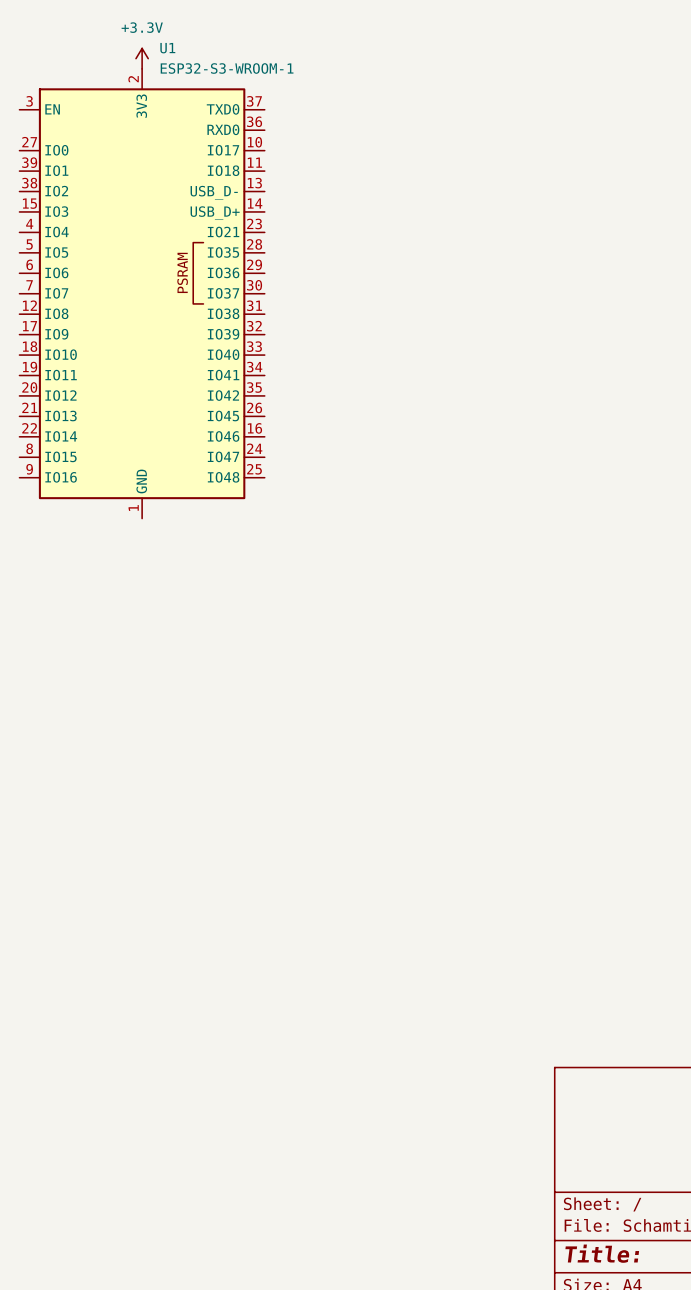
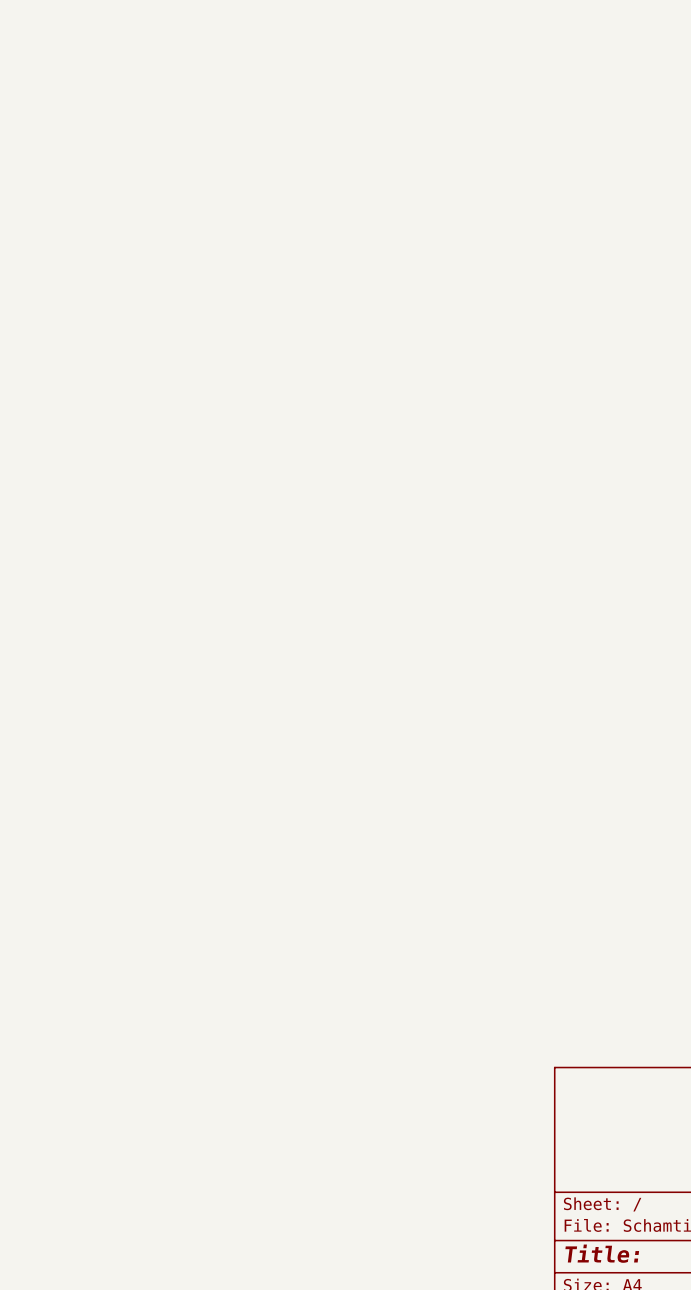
power symbol: +3.3V (142, 58) -> none
U1: ESP32-S3-WROOM-1 (142, 293) -> none

